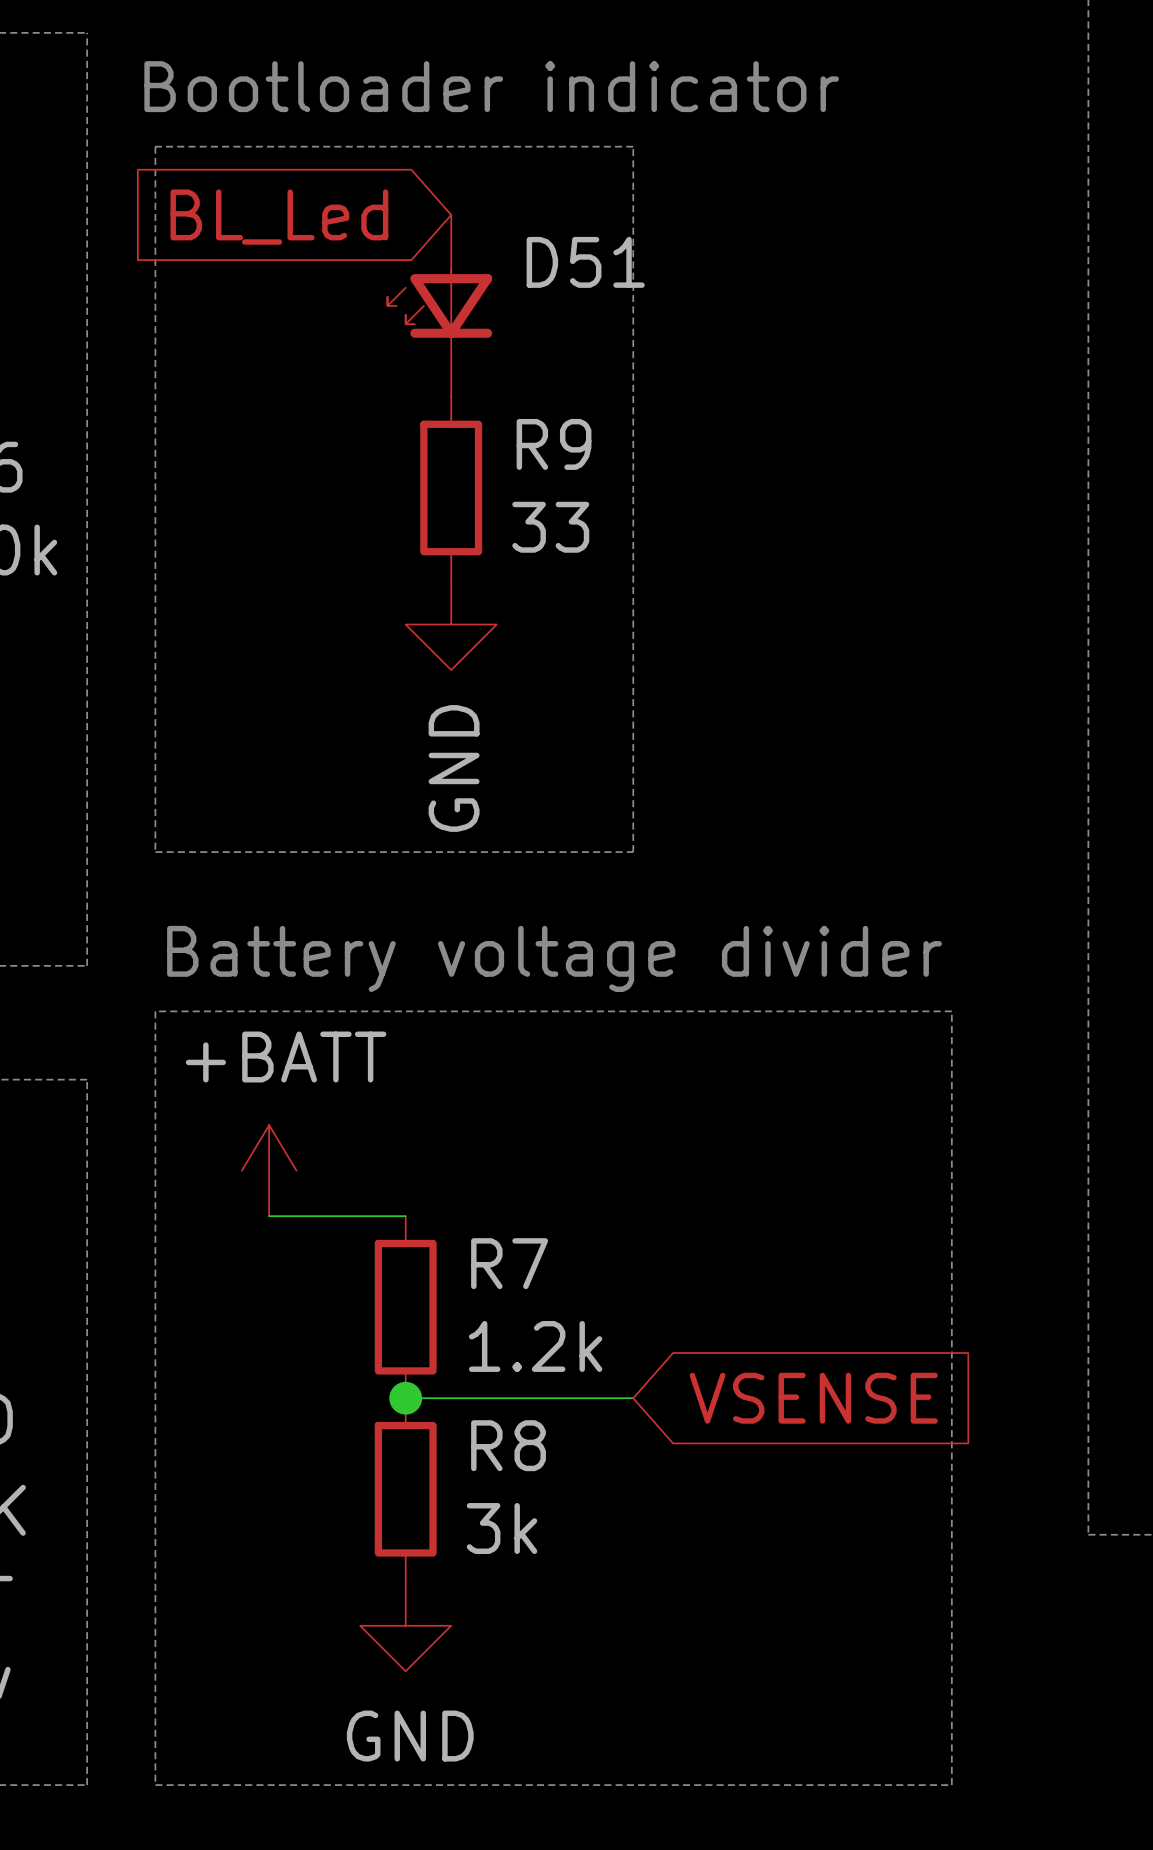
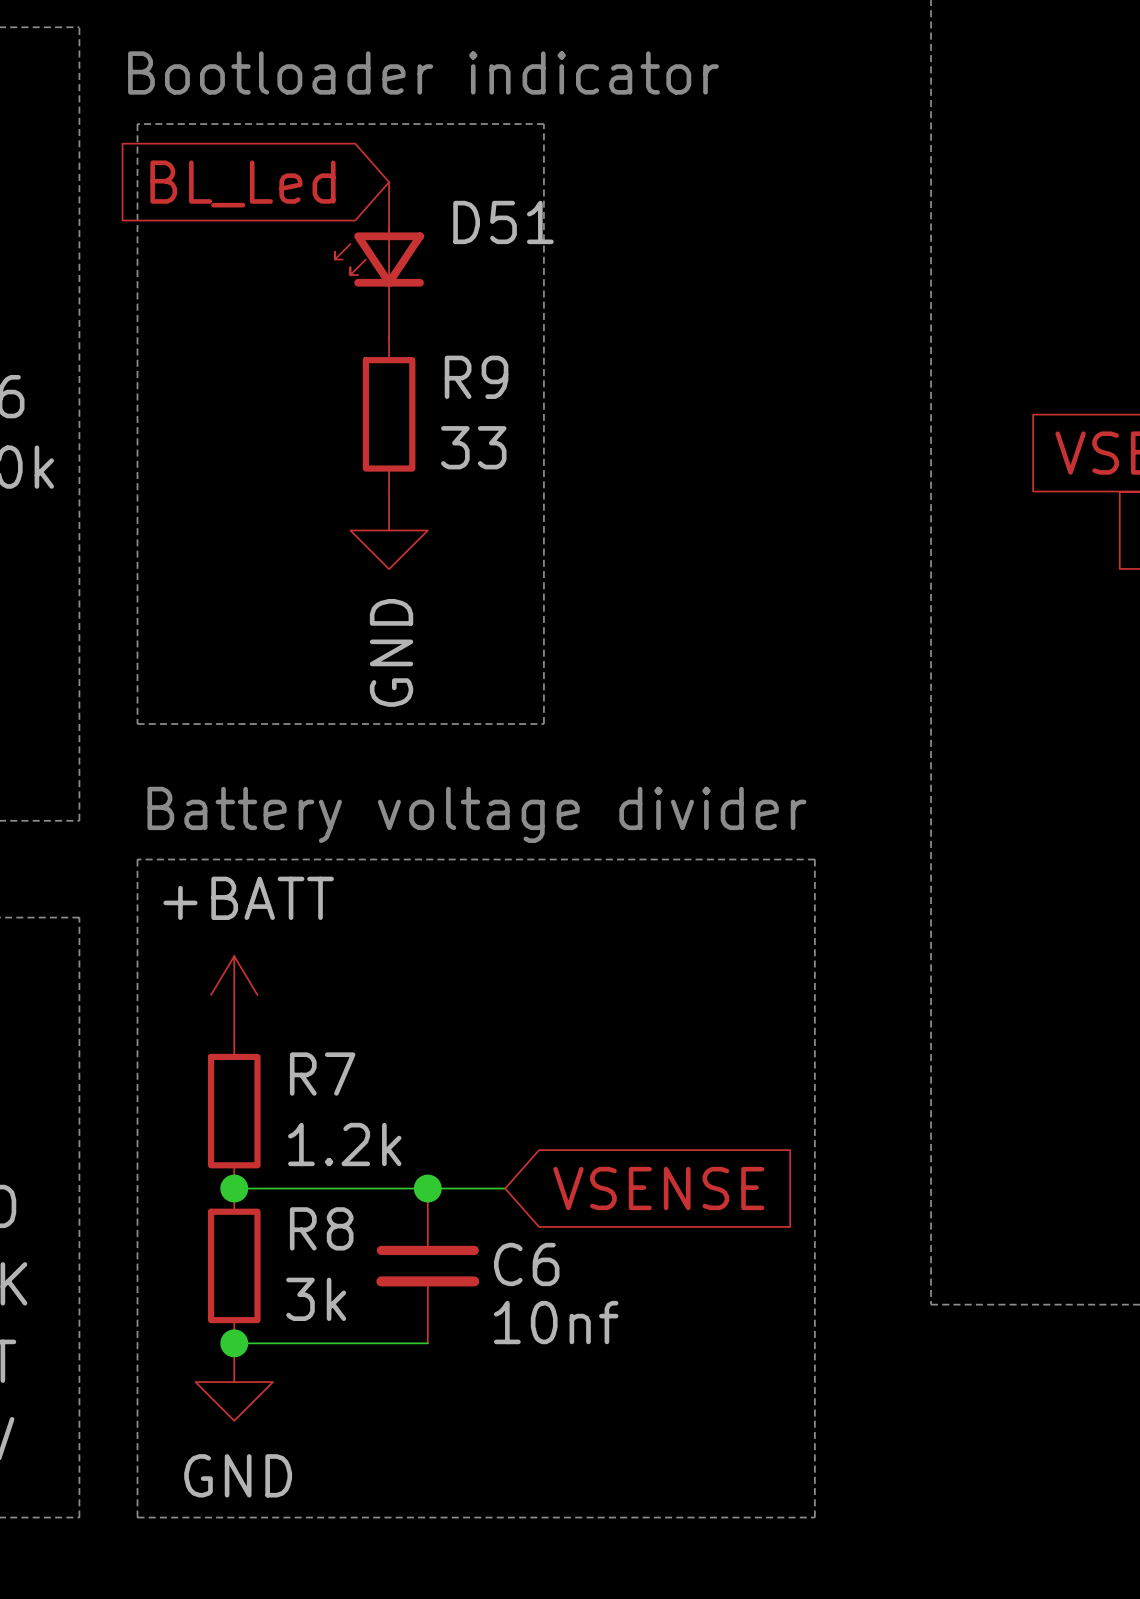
wire: (269, 1216) (405, 1216) -> (234, 1188) (350, 1188)
R7 position: (405, 1307) -> (234, 1111)
junction: none -> (234, 1188)
junction: (405, 1398) -> none
junction: none -> (427, 1188)
wire: (587, 1398) (633, 1398) -> none
global label position: VSENSE (813, 1398) -> VSENSE (658, 1188)
R8 position: (405, 1489) -> (234, 1265)
C6: none -> 10nf (427, 1265)
wire: none -> (234, 1343) (427, 1343)
junction: none -> (234, 1343)
power symbol position: GND (405, 1625) -> GND (234, 1382)

